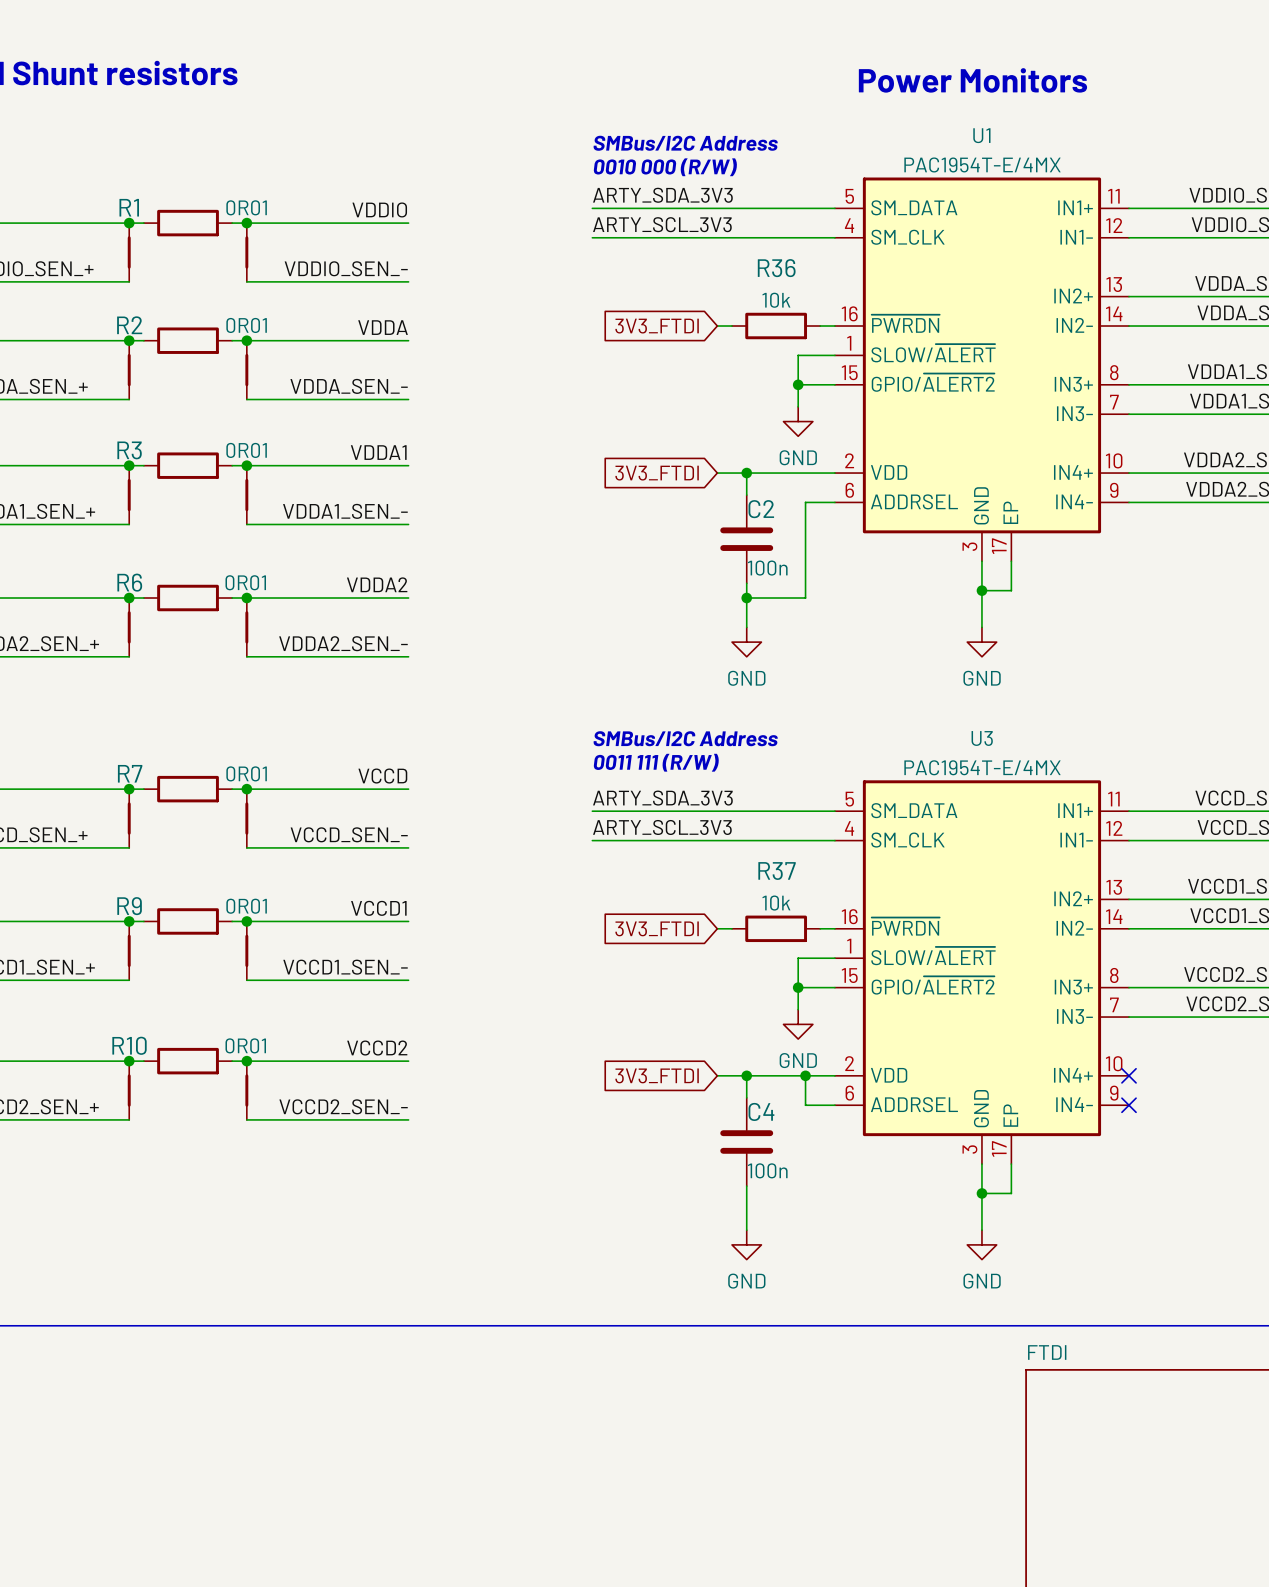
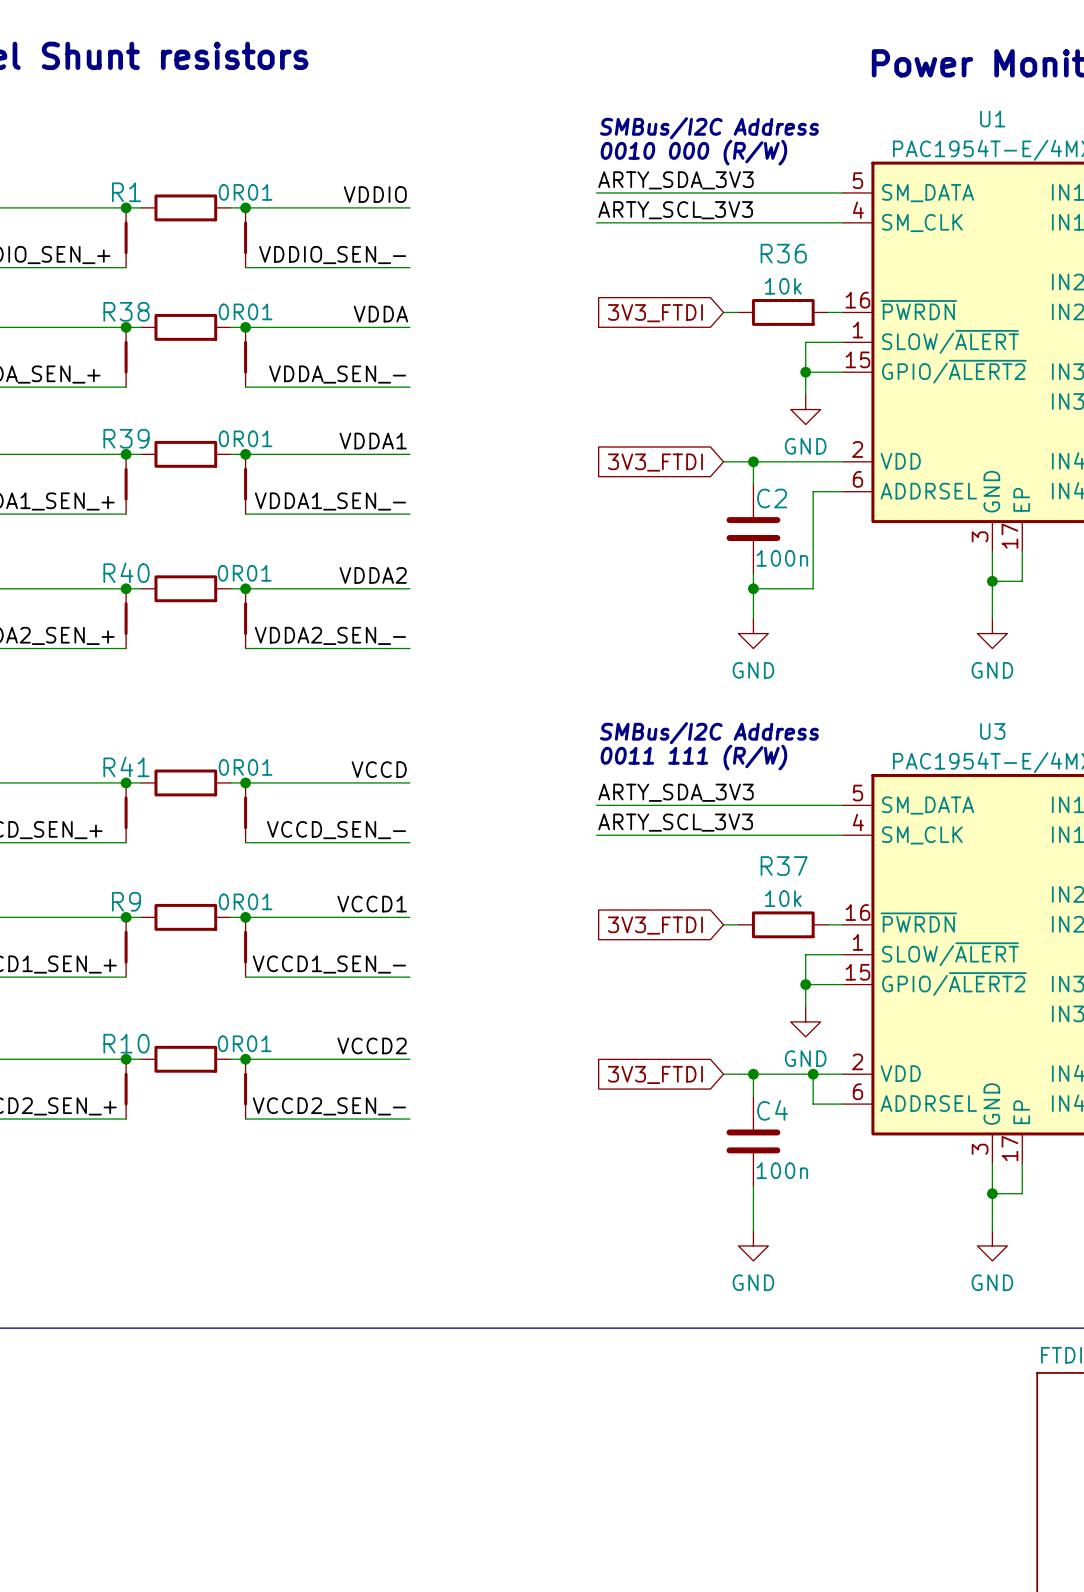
R2 name: R2 (129, 325) -> R38 (126, 311)
R3 name: R3 (129, 450) -> R39 (126, 438)
R6 name: R6 (129, 582) -> R40 (126, 572)
R7 name: R7 (130, 773) -> R41 (126, 766)

